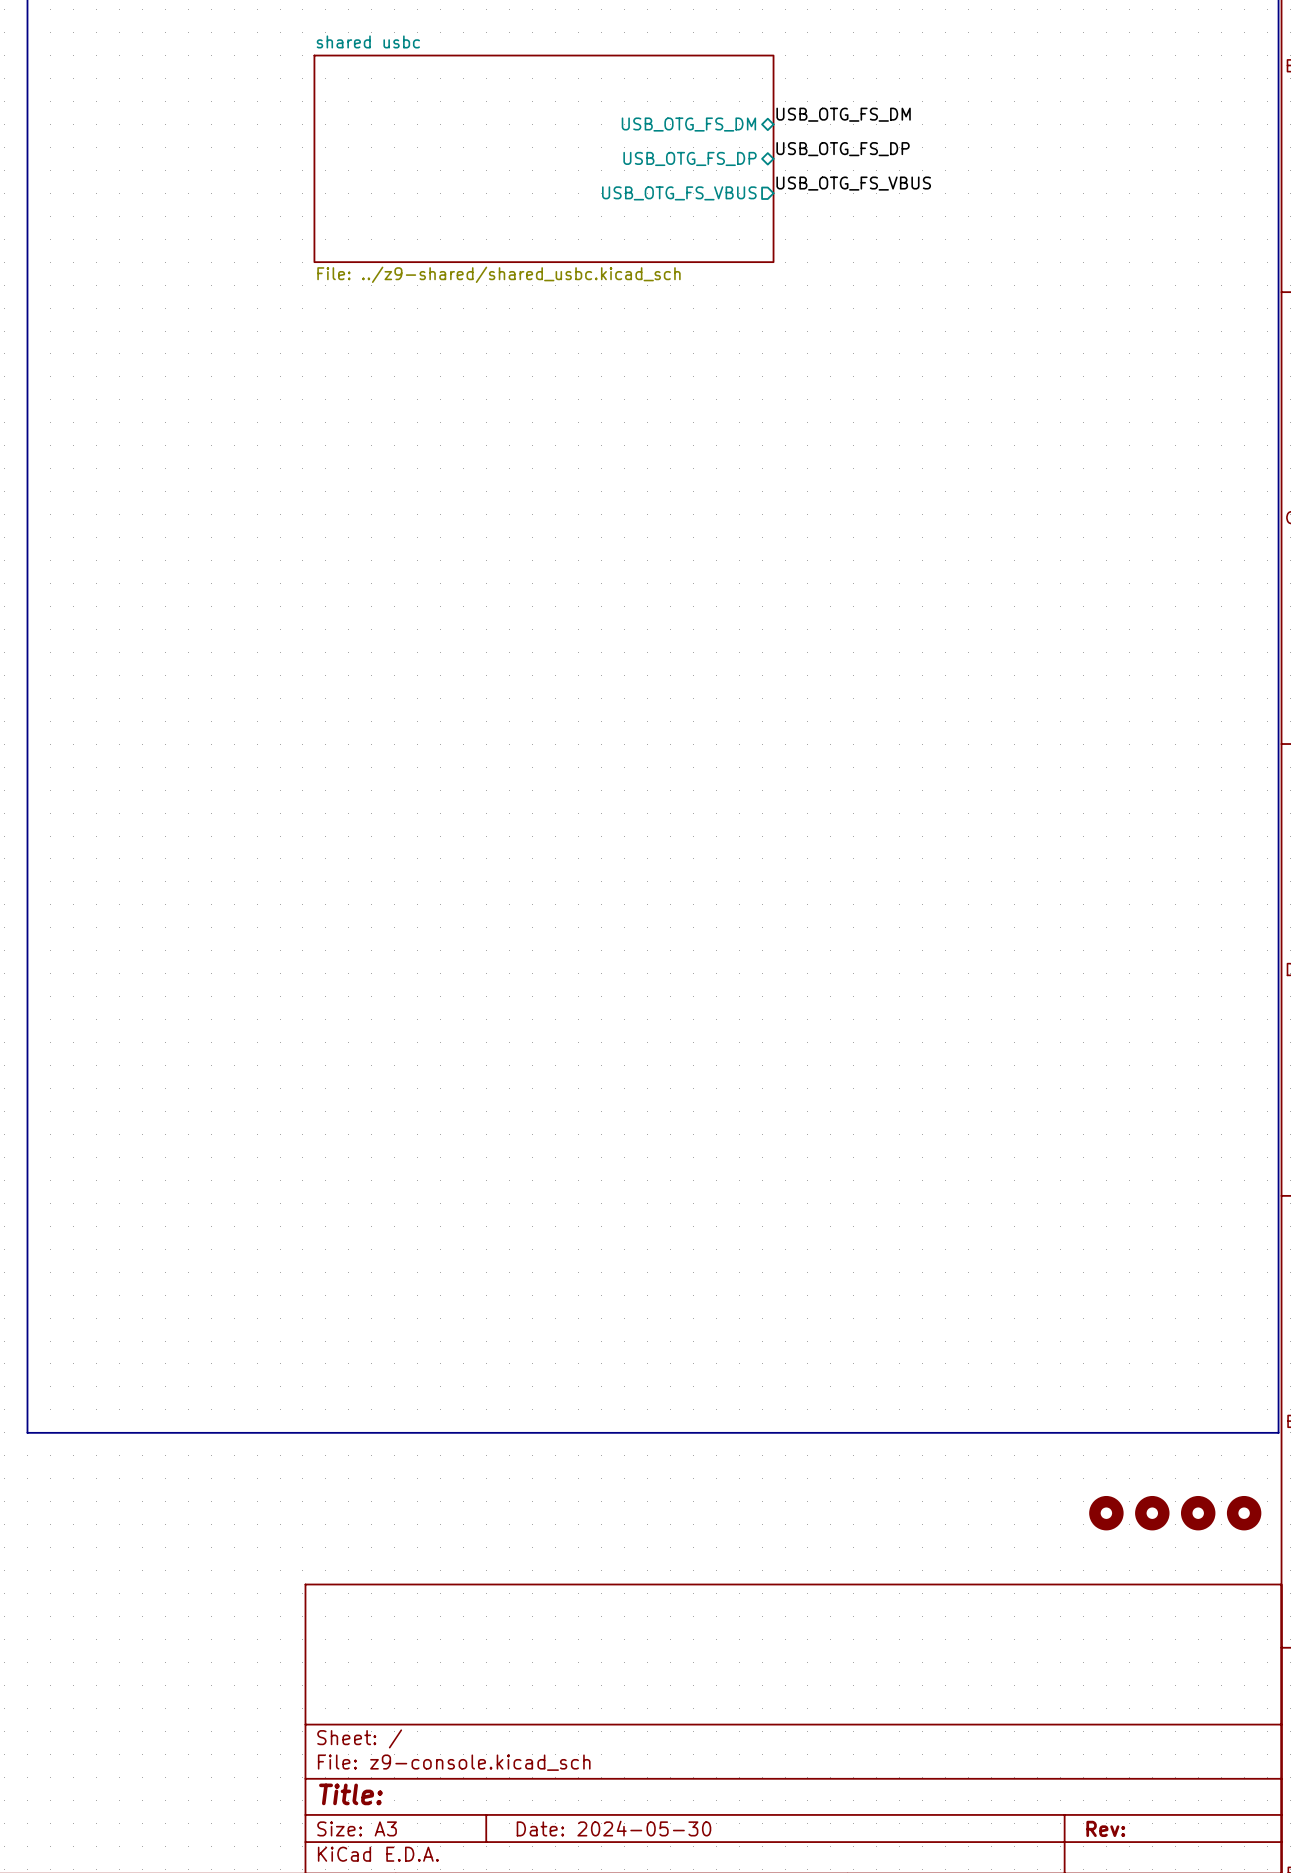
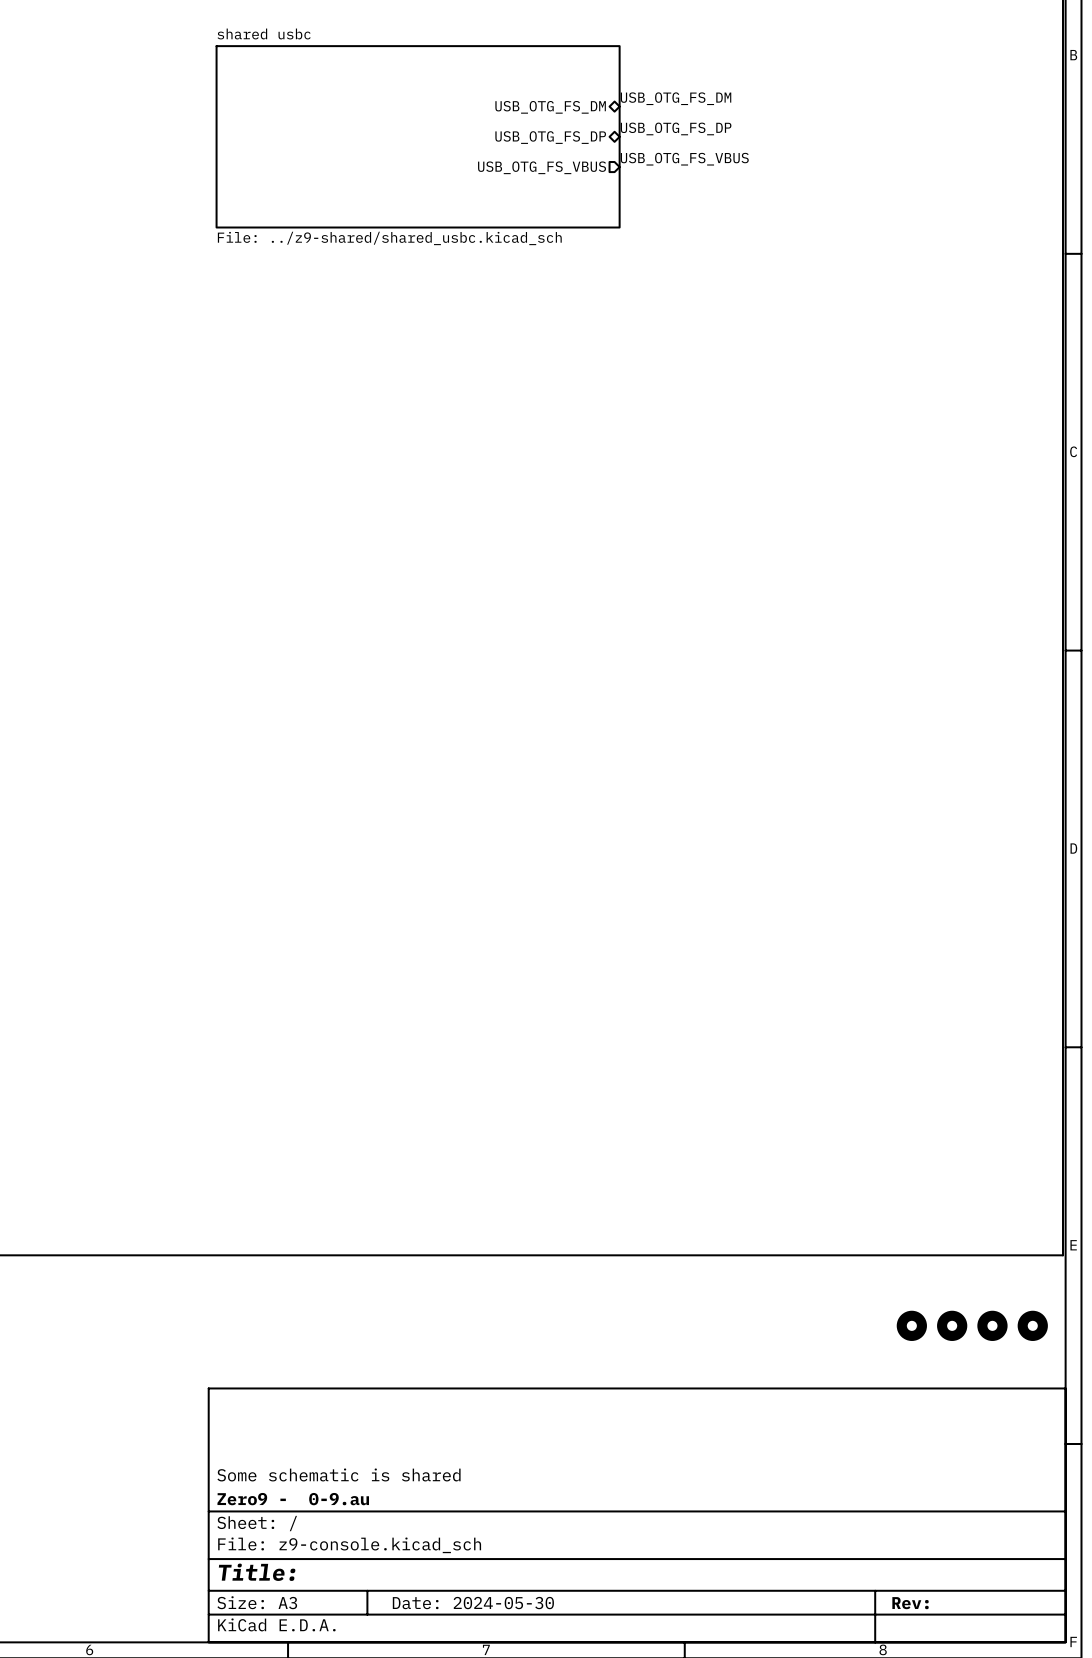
title block: none -> Some schematic is shared (338, 1474)
title block: none -> Zero9 - 0-9.au (293, 1499)

